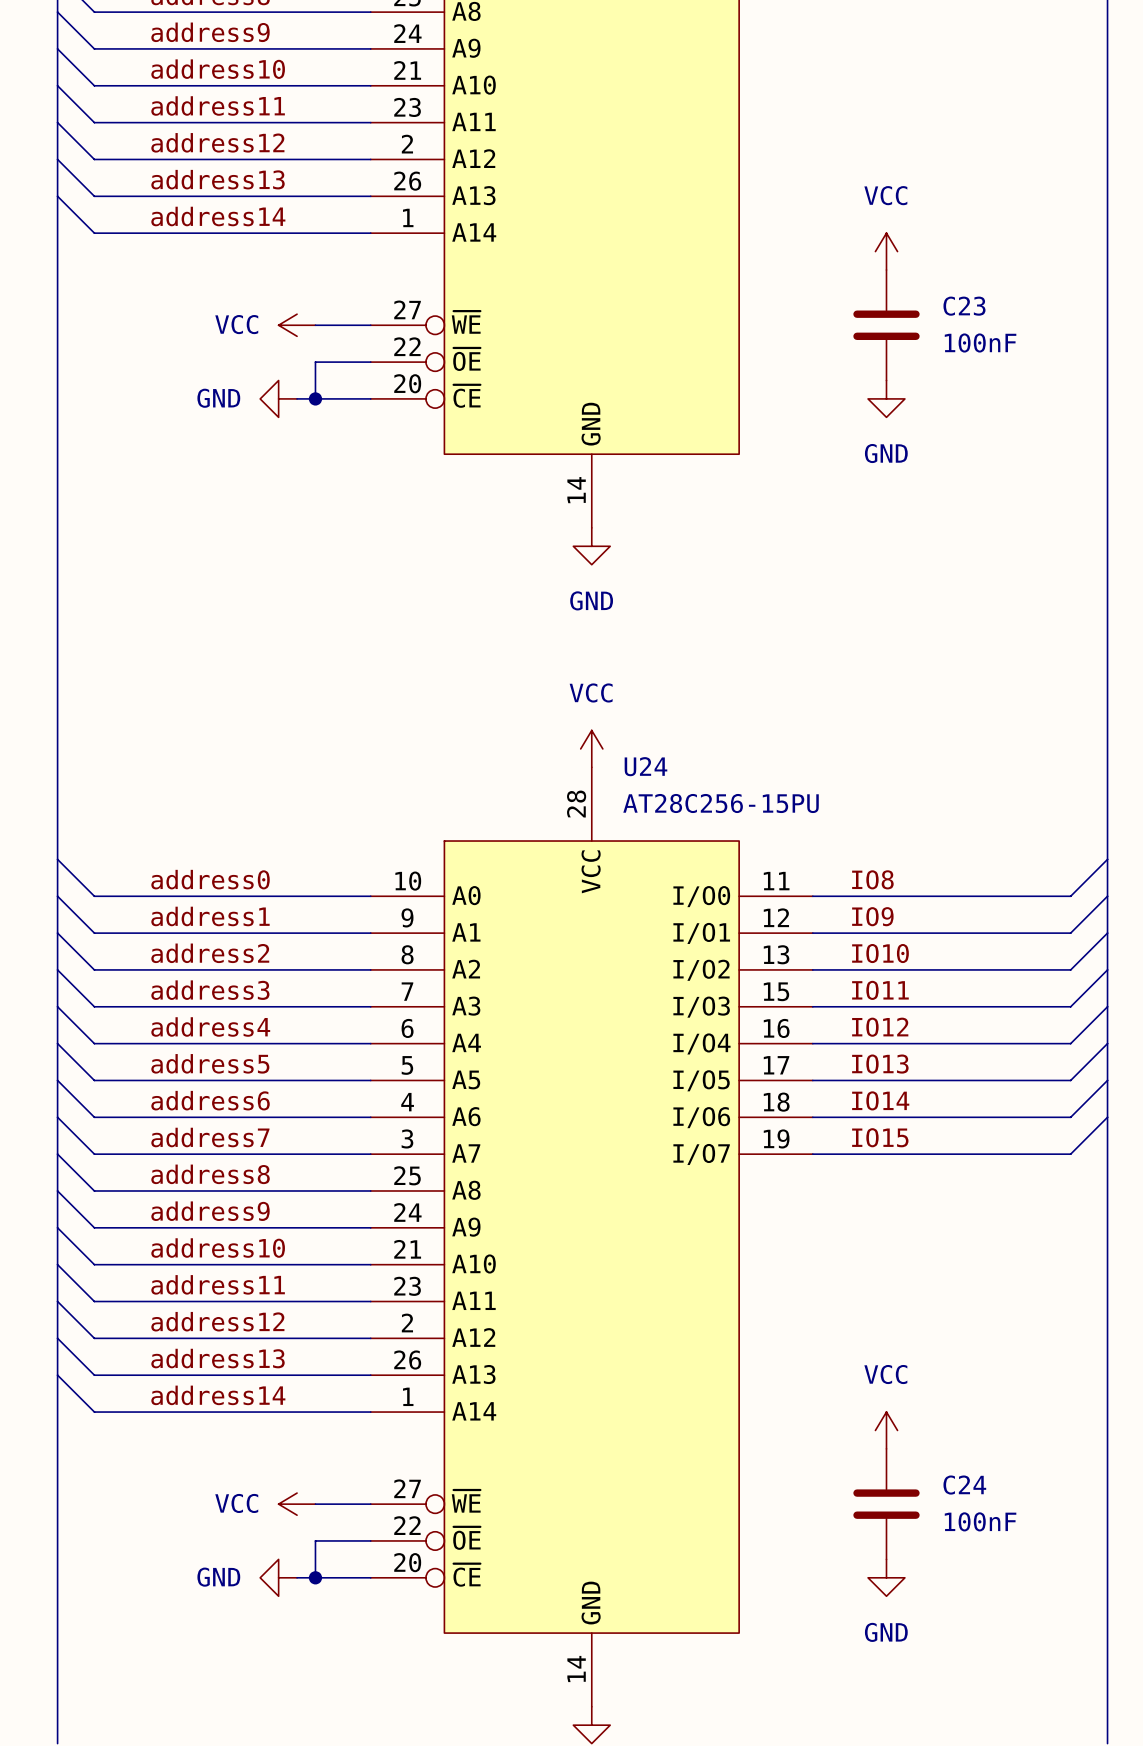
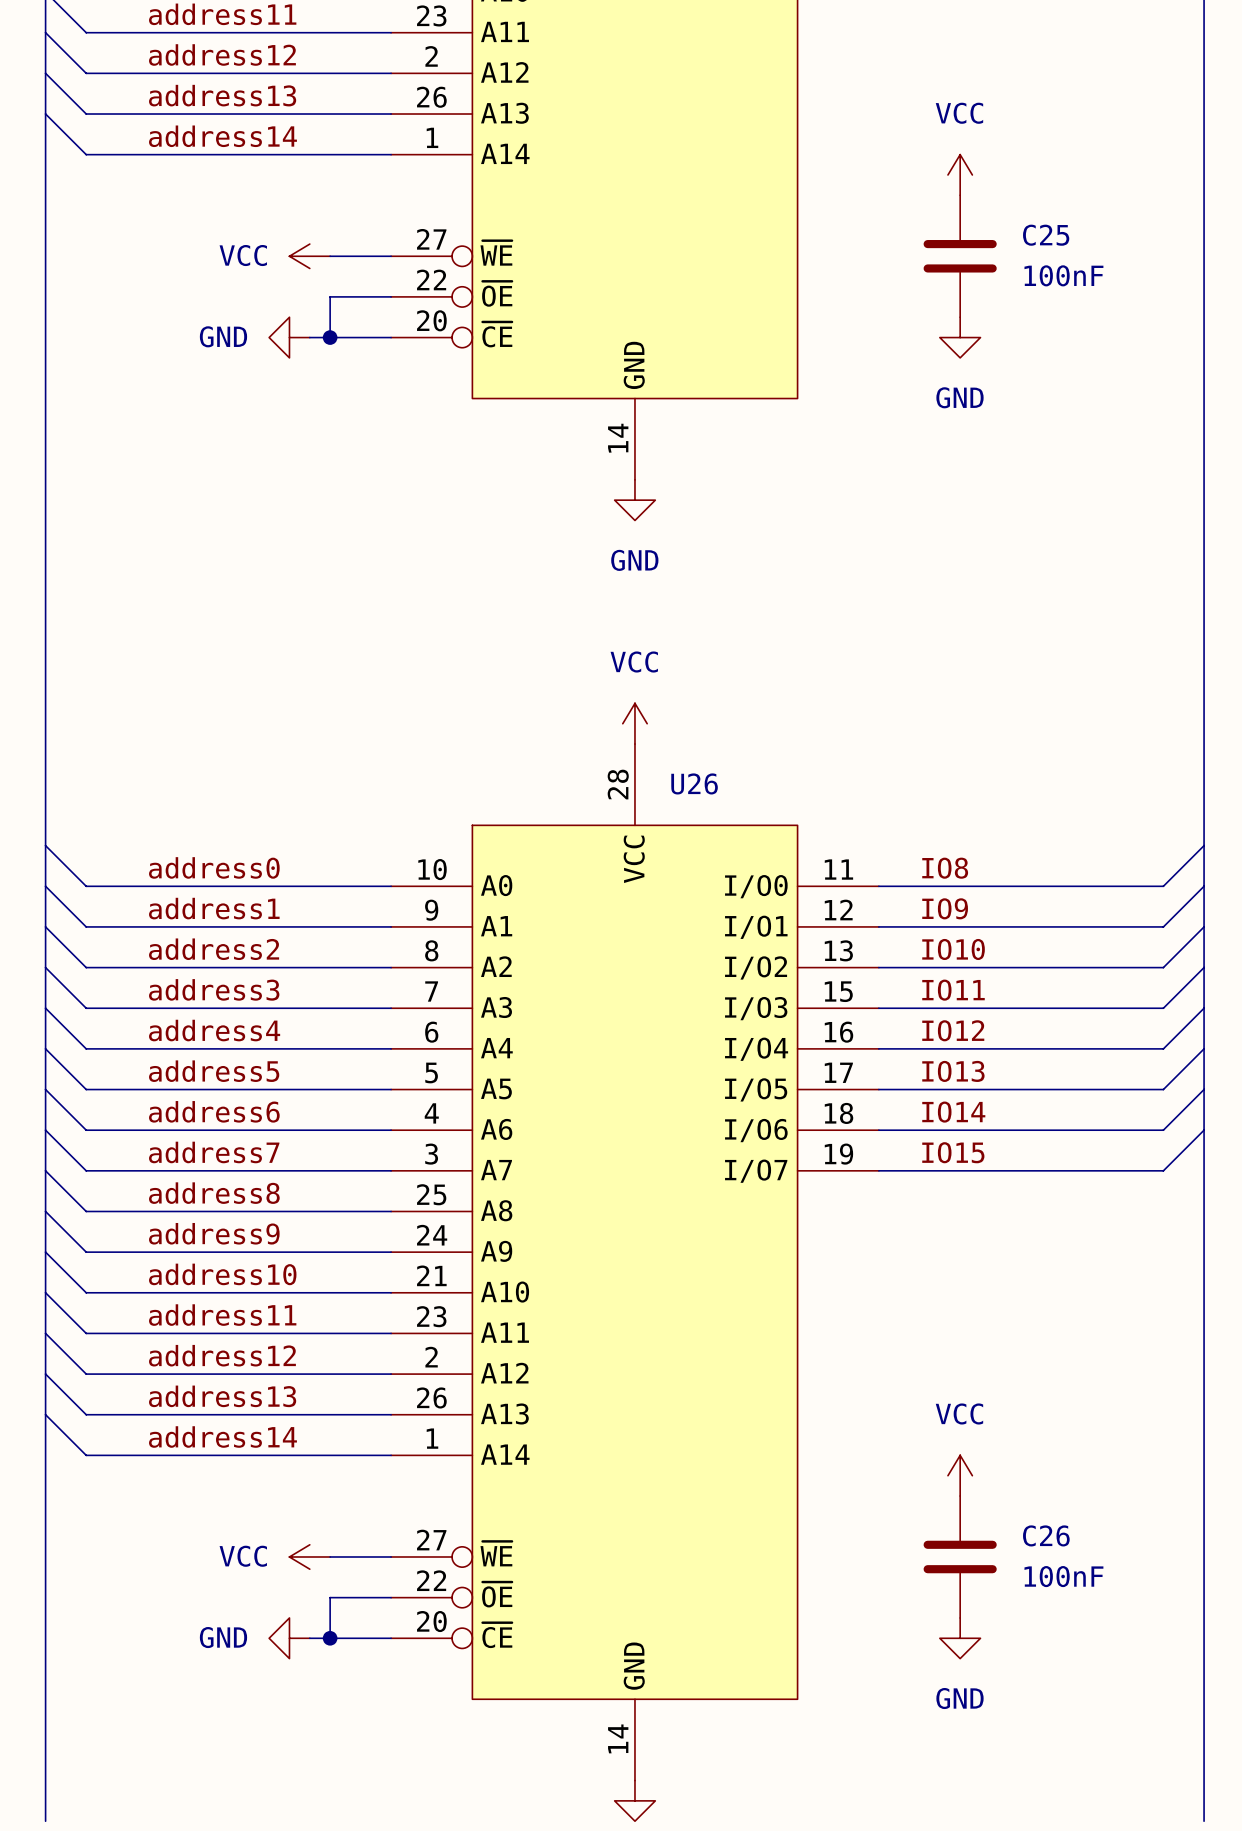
C23 name: C23 (964, 306) -> C25 (1046, 235)
U24 name: U24 (645, 766) -> U26 (694, 783)
U24 value: AT28C256-15PU (721, 803) -> none
C24 name: C24 (964, 1485) -> C26 (1046, 1535)

